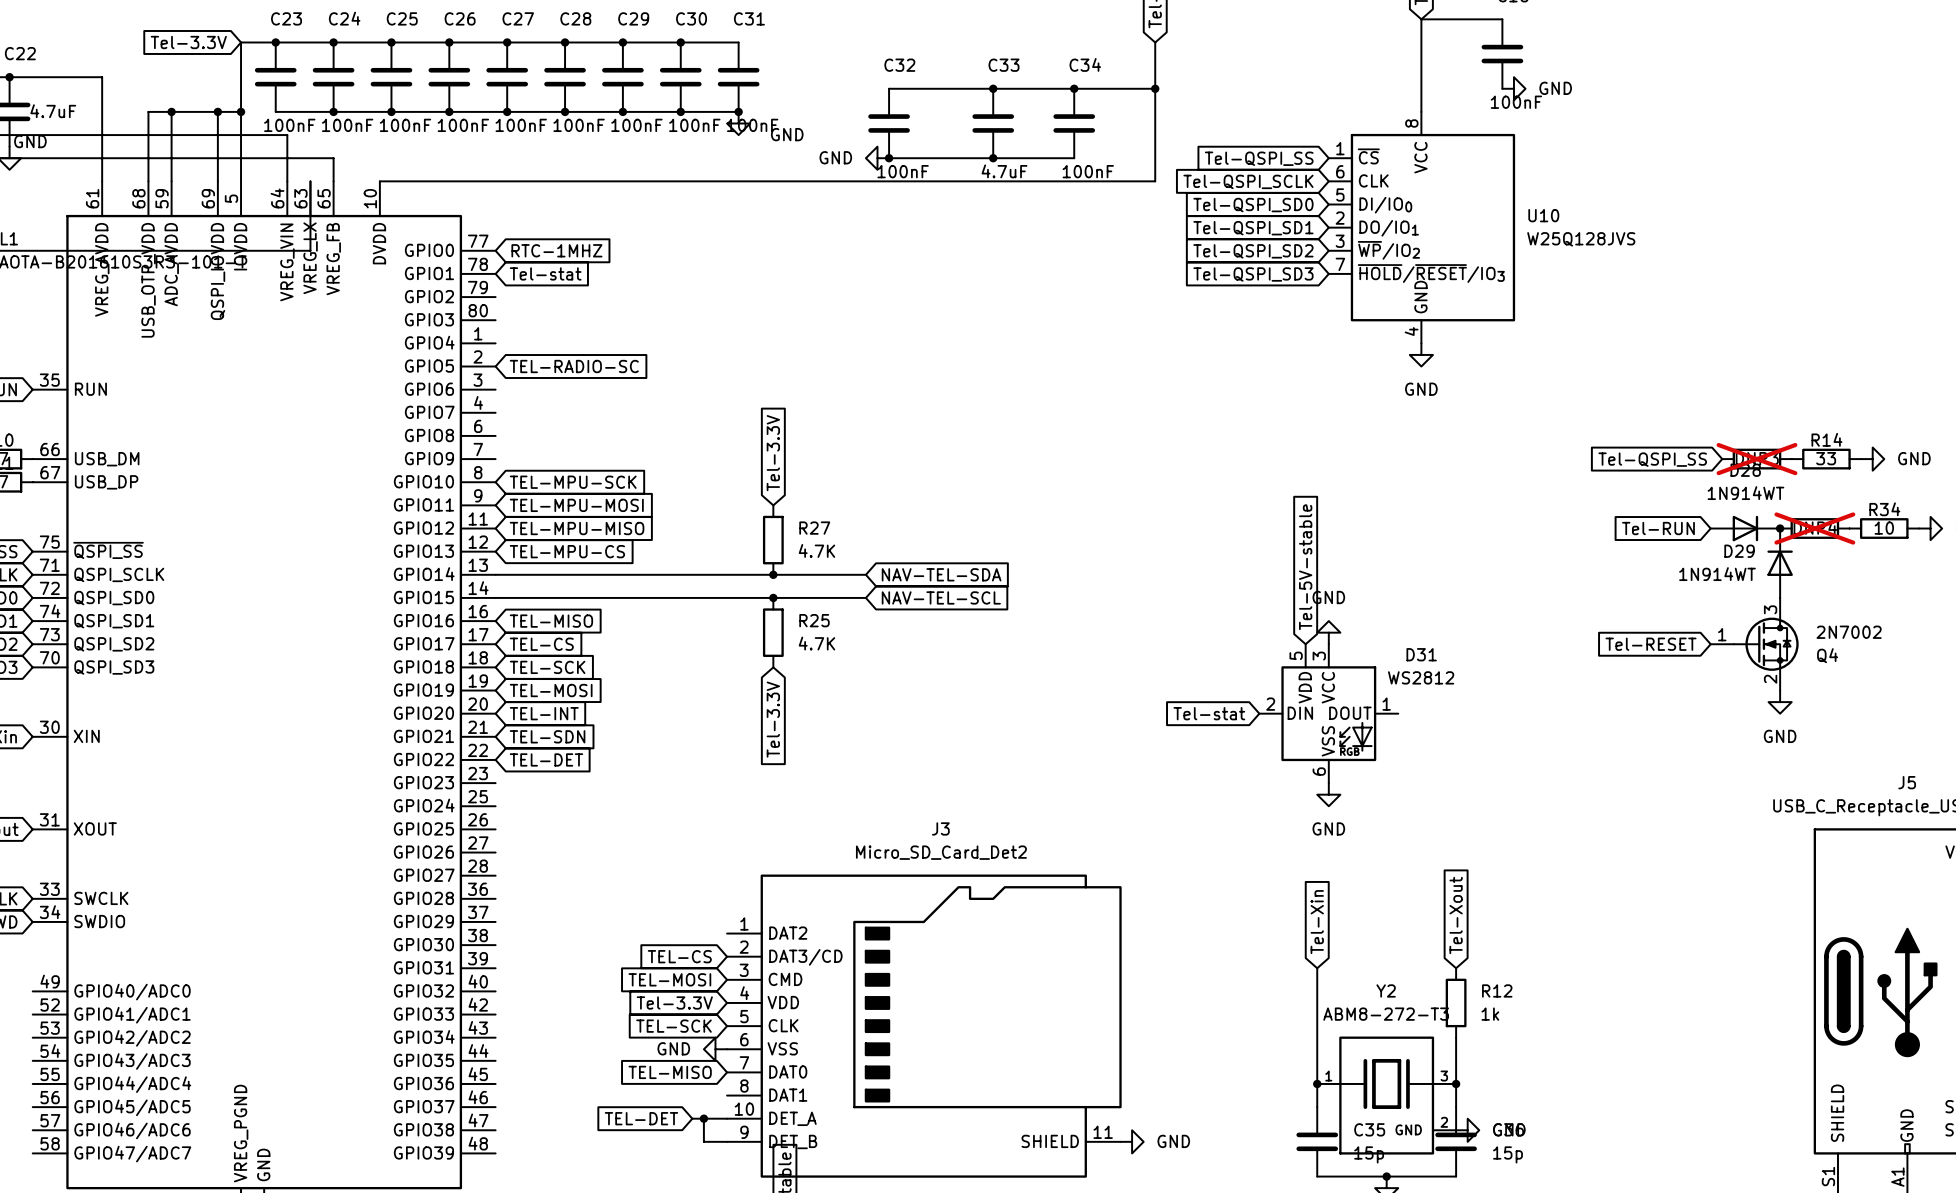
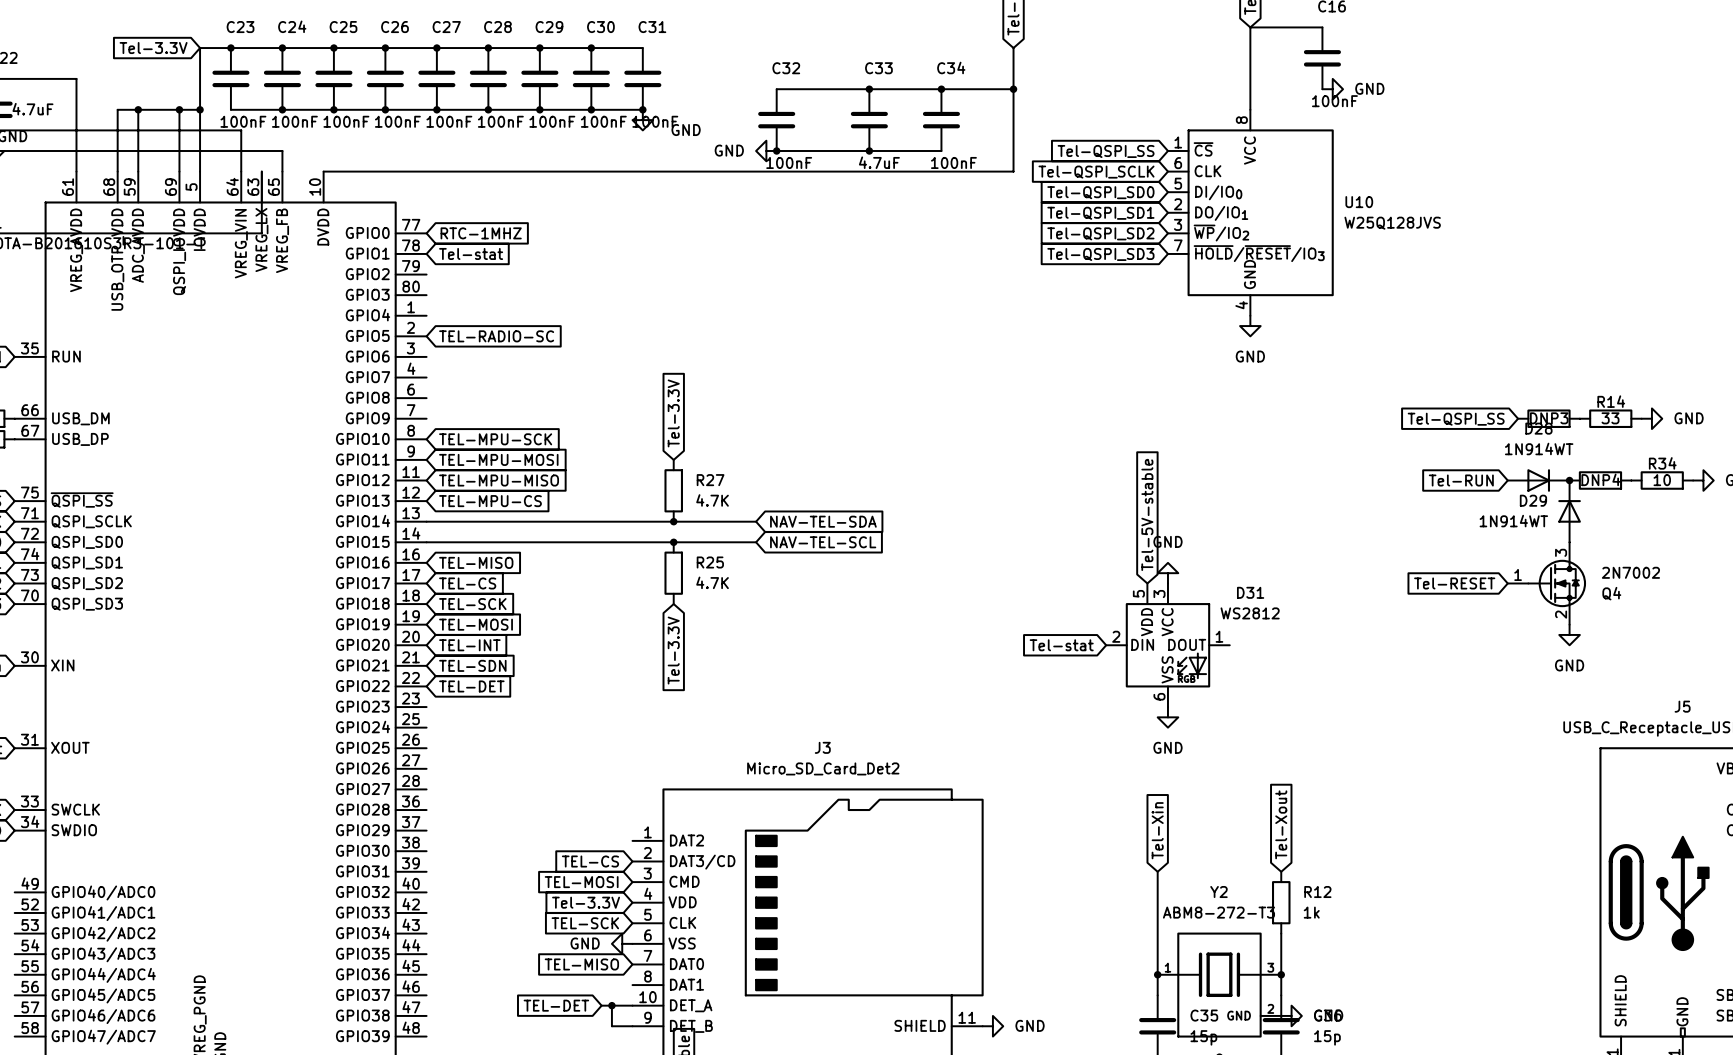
DNP3 do-not-place cross: (1756, 459) -> none
DNP4 do-not-place cross: (1814, 528) -> none

